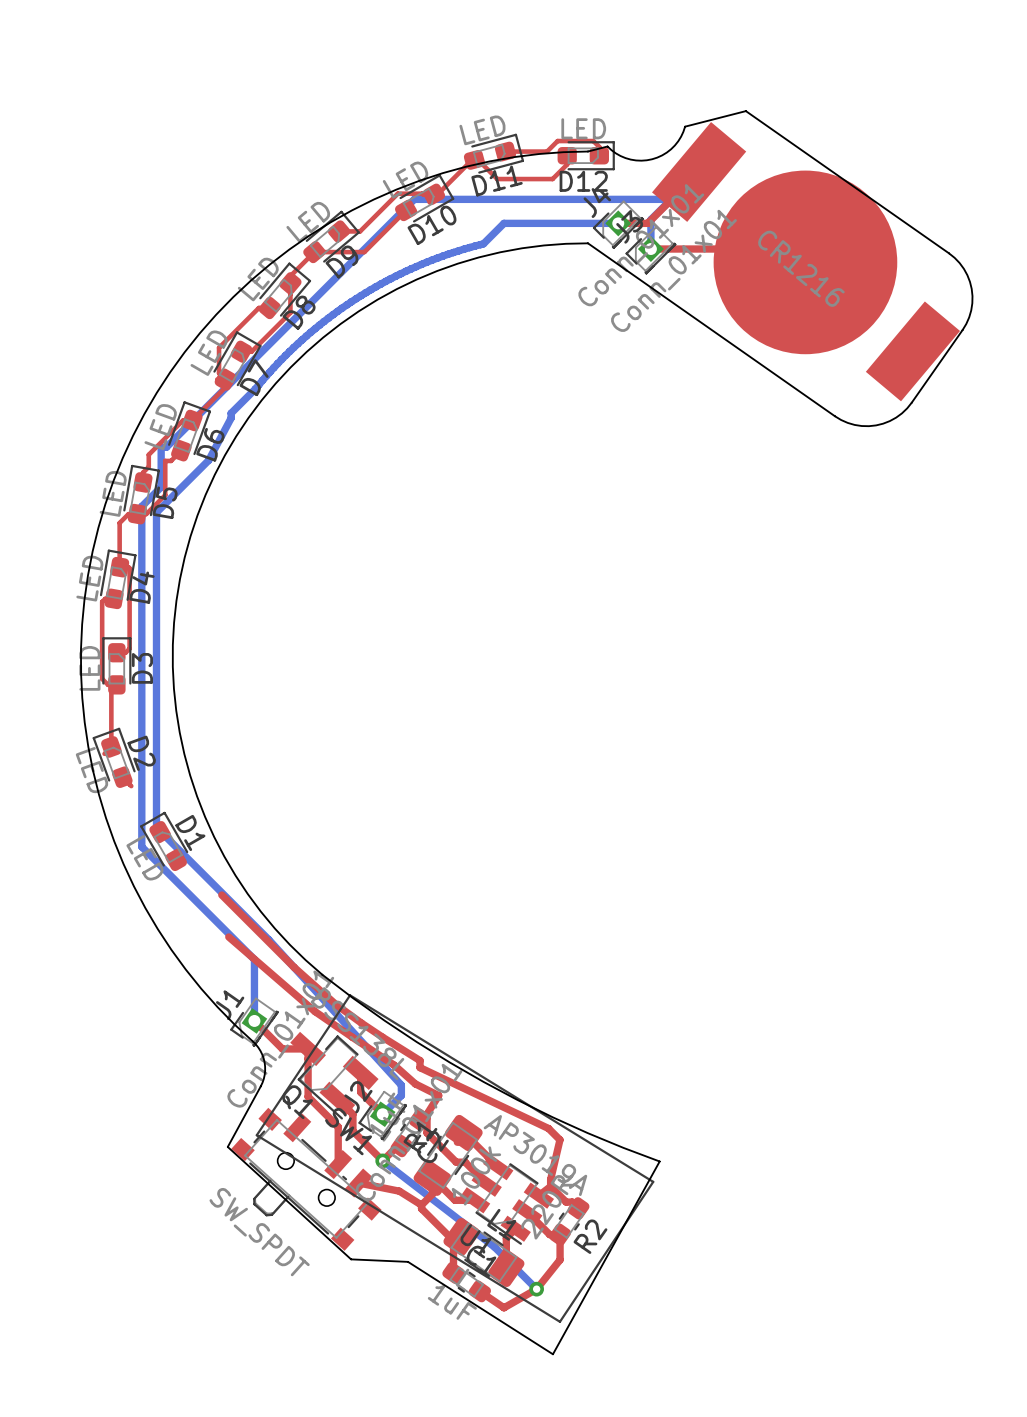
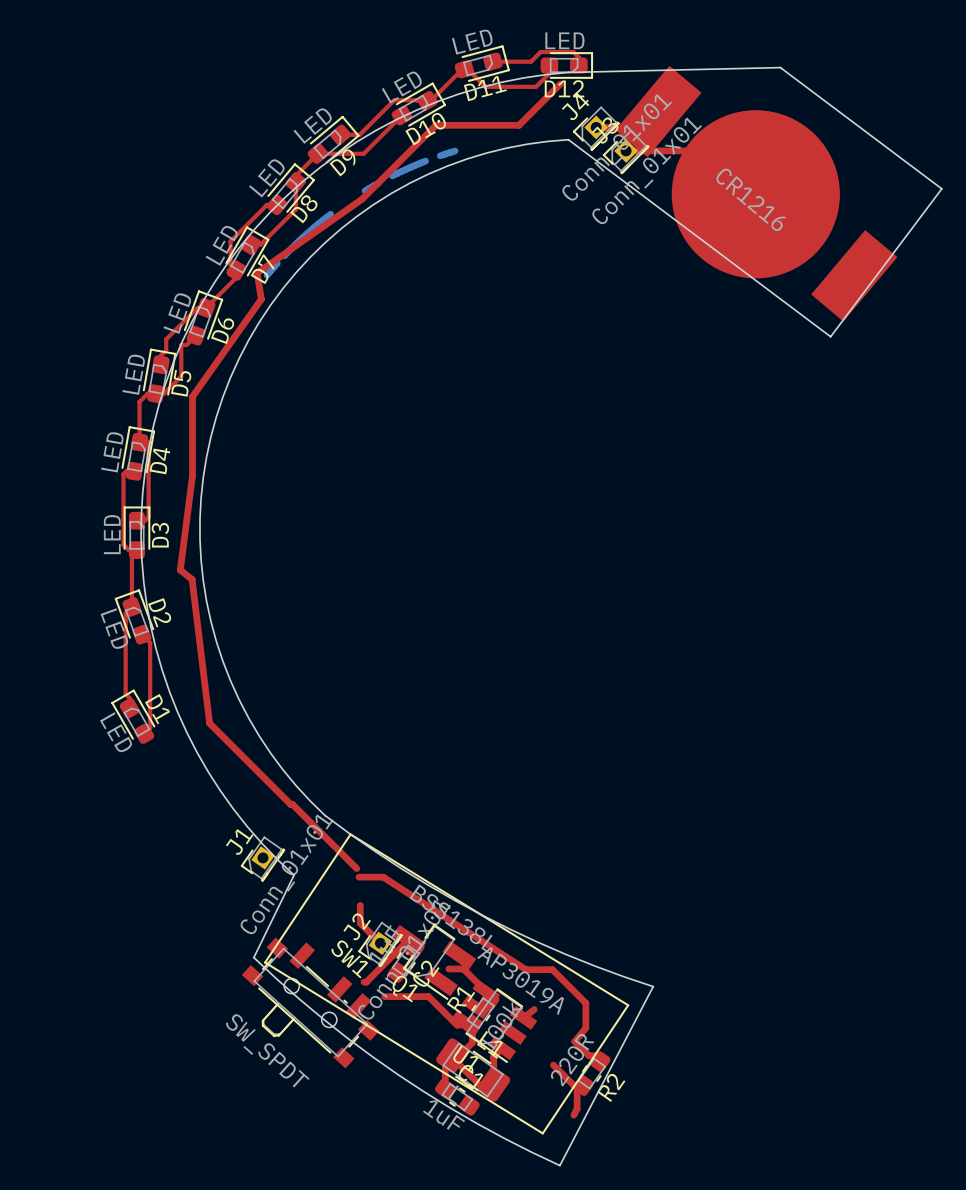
board edge: (745, 111) (949, 253) (959, 263) (967, 275) (971, 288) (972, 303) (966, 323) (911, 402) (902, 413) (883, 423) (868, 426) (854, 424) (841, 420) (588, 243) (522, 248) (478, 257) (416, 279) (358, 311) (306, 351) (275, 383) (236, 436) (214, 474) (190, 536) (176, 600) (172, 644) (173, 688) (179, 732) (190, 775) (205, 816) (224, 856) (247, 893) (274, 928) (322, 974) (384, 1020) (449, 1062) (552, 1117) (659, 1161) (552, 1354) (408, 1261) (351, 1259) (227, 1146) (262, 1082) (265, 1070) (263, 1058) (255, 1044) (217, 1007) (171, 949) (145, 908) (114, 841) (93, 770) (82, 698) (82, 624) (87, 575) (98, 527) (113, 480) (133, 435) (156, 392) (184, 352) (216, 314) (251, 280) (289, 249) (351, 210) (396, 189) (442, 173) (514, 157) (588, 151) (607, 146) (620, 156) (630, 159) (652, 159) (671, 149) (678, 141) (685, 126) (745, 111) -> (780, 67) (568, 72) (523, 77) (480, 87) (437, 101) (396, 119) (357, 141) (303, 181) (270, 212) (240, 245) (214, 282) (192, 321) (173, 362) (159, 404) (148, 448) (141, 515) (141, 559) (150, 626) (162, 669) (177, 712) (208, 771) (247, 826) (294, 875) (253, 957) (323, 1019) (398, 1074) (477, 1123) (559, 1165) (653, 986) (594, 966) (537, 942) (454, 900) (401, 868) (350, 833) (325, 815) (296, 785) (270, 753) (248, 718) (230, 680) (216, 641) (206, 601) (201, 560) (200, 518) (206, 457) (222, 397) (248, 340) (282, 288) (310, 257) (356, 216) (409, 183) (466, 159) (506, 148) (568, 139) (830, 336) (941, 188) (780, 67)
top track: none -> (560, 84) (519, 125) (435, 125) (362, 199) (257, 273) (261, 299) (192, 396) (192, 475) (180, 570) (192, 579) (209, 723) (356, 868)
bottom track: (618, 223) (503, 223) (483, 243) (464, 249) -> none
bottom track: (650, 249) (650, 219) (671, 199) (414, 199) (166, 447) (161, 447) (161, 487) (141, 506) (141, 846) (254, 959) (254, 1020) -> none
bottom track: (447, 254) (432, 260) -> none
part position: (806, 261) -> (756, 193)
bottom track: (395, 276) (380, 284) -> none
bottom track: (365, 292) (346, 304) -> none
bottom track: (346, 304) (328, 318) -> none
bottom track: (277, 363) (270, 371) -> none
bottom track: (258, 384) (231, 413) (231, 418) (208, 460) (156, 512) (156, 827) (268, 939) (401, 1085) (401, 1095) (382, 1114) -> none
top track: none -> (125, 613) (125, 694) (129, 698) (129, 708)
top track: none -> (150, 642) (150, 727) (144, 733)
D1 position: (164, 841) -> (133, 716)
top track: (221, 895) (294, 967) (336, 1004) (420, 1060) (420, 1067) (548, 1128) (559, 1139) (550, 1186) (566, 1202) (572, 1202) (578, 1208) -> none
top track: (228, 937) (315, 1011) (394, 1065) (415, 1083) (438, 1095) (427, 1114) (427, 1132) (456, 1162) (465, 1162) (486, 1183) -> none
top track: (254, 1020) (282, 1048) (308, 1048) (308, 1096) (338, 1126) (338, 1164) -> none
top track: none -> (358, 877) (383, 877) (525, 969) (552, 969) (585, 1003) (585, 1028) (574, 1041) (589, 1055) (594, 1055) (600, 1061)
Q1 rotation: 0° (334, 1075) -> 7° counterclockwise (434, 961)
Q1 position: (334, 1075) -> (434, 961)
top track: (337, 1098) (352, 1114) (352, 1131) (382, 1160) (397, 1146) (401, 1146) -> none
top track: none -> (408, 939) (366, 982) (364, 982)
R1 footprint: [413, 1114, 483, 1196] -> [462, 990, 500, 1036]
bottom track: (382, 1160) (494, 1247) (536, 1289) -> none
via: (382, 1160) -> none
top track: none -> (384, 996) (428, 996) (457, 1025) (472, 1025) (472, 1042) (456, 1058) (456, 1061) (488, 1093)
top track: (358, 1183) (399, 1191) (421, 1205) -> none
top track: (475, 1200) (455, 1200) (432, 1177) (432, 1194) (421, 1205) -> none
top track: (421, 1205) (421, 1208) (455, 1243) -> none
top track: (527, 1212) (549, 1234) (560, 1234) (560, 1259) (536, 1289) (503, 1307) (479, 1291) -> none
R2 position: (569, 1221) -> (591, 1073)
top track: none -> (553, 1065) (574, 1085) (583, 1085) (577, 1092) (577, 1108) (573, 1115)
via: (536, 1289) -> none

